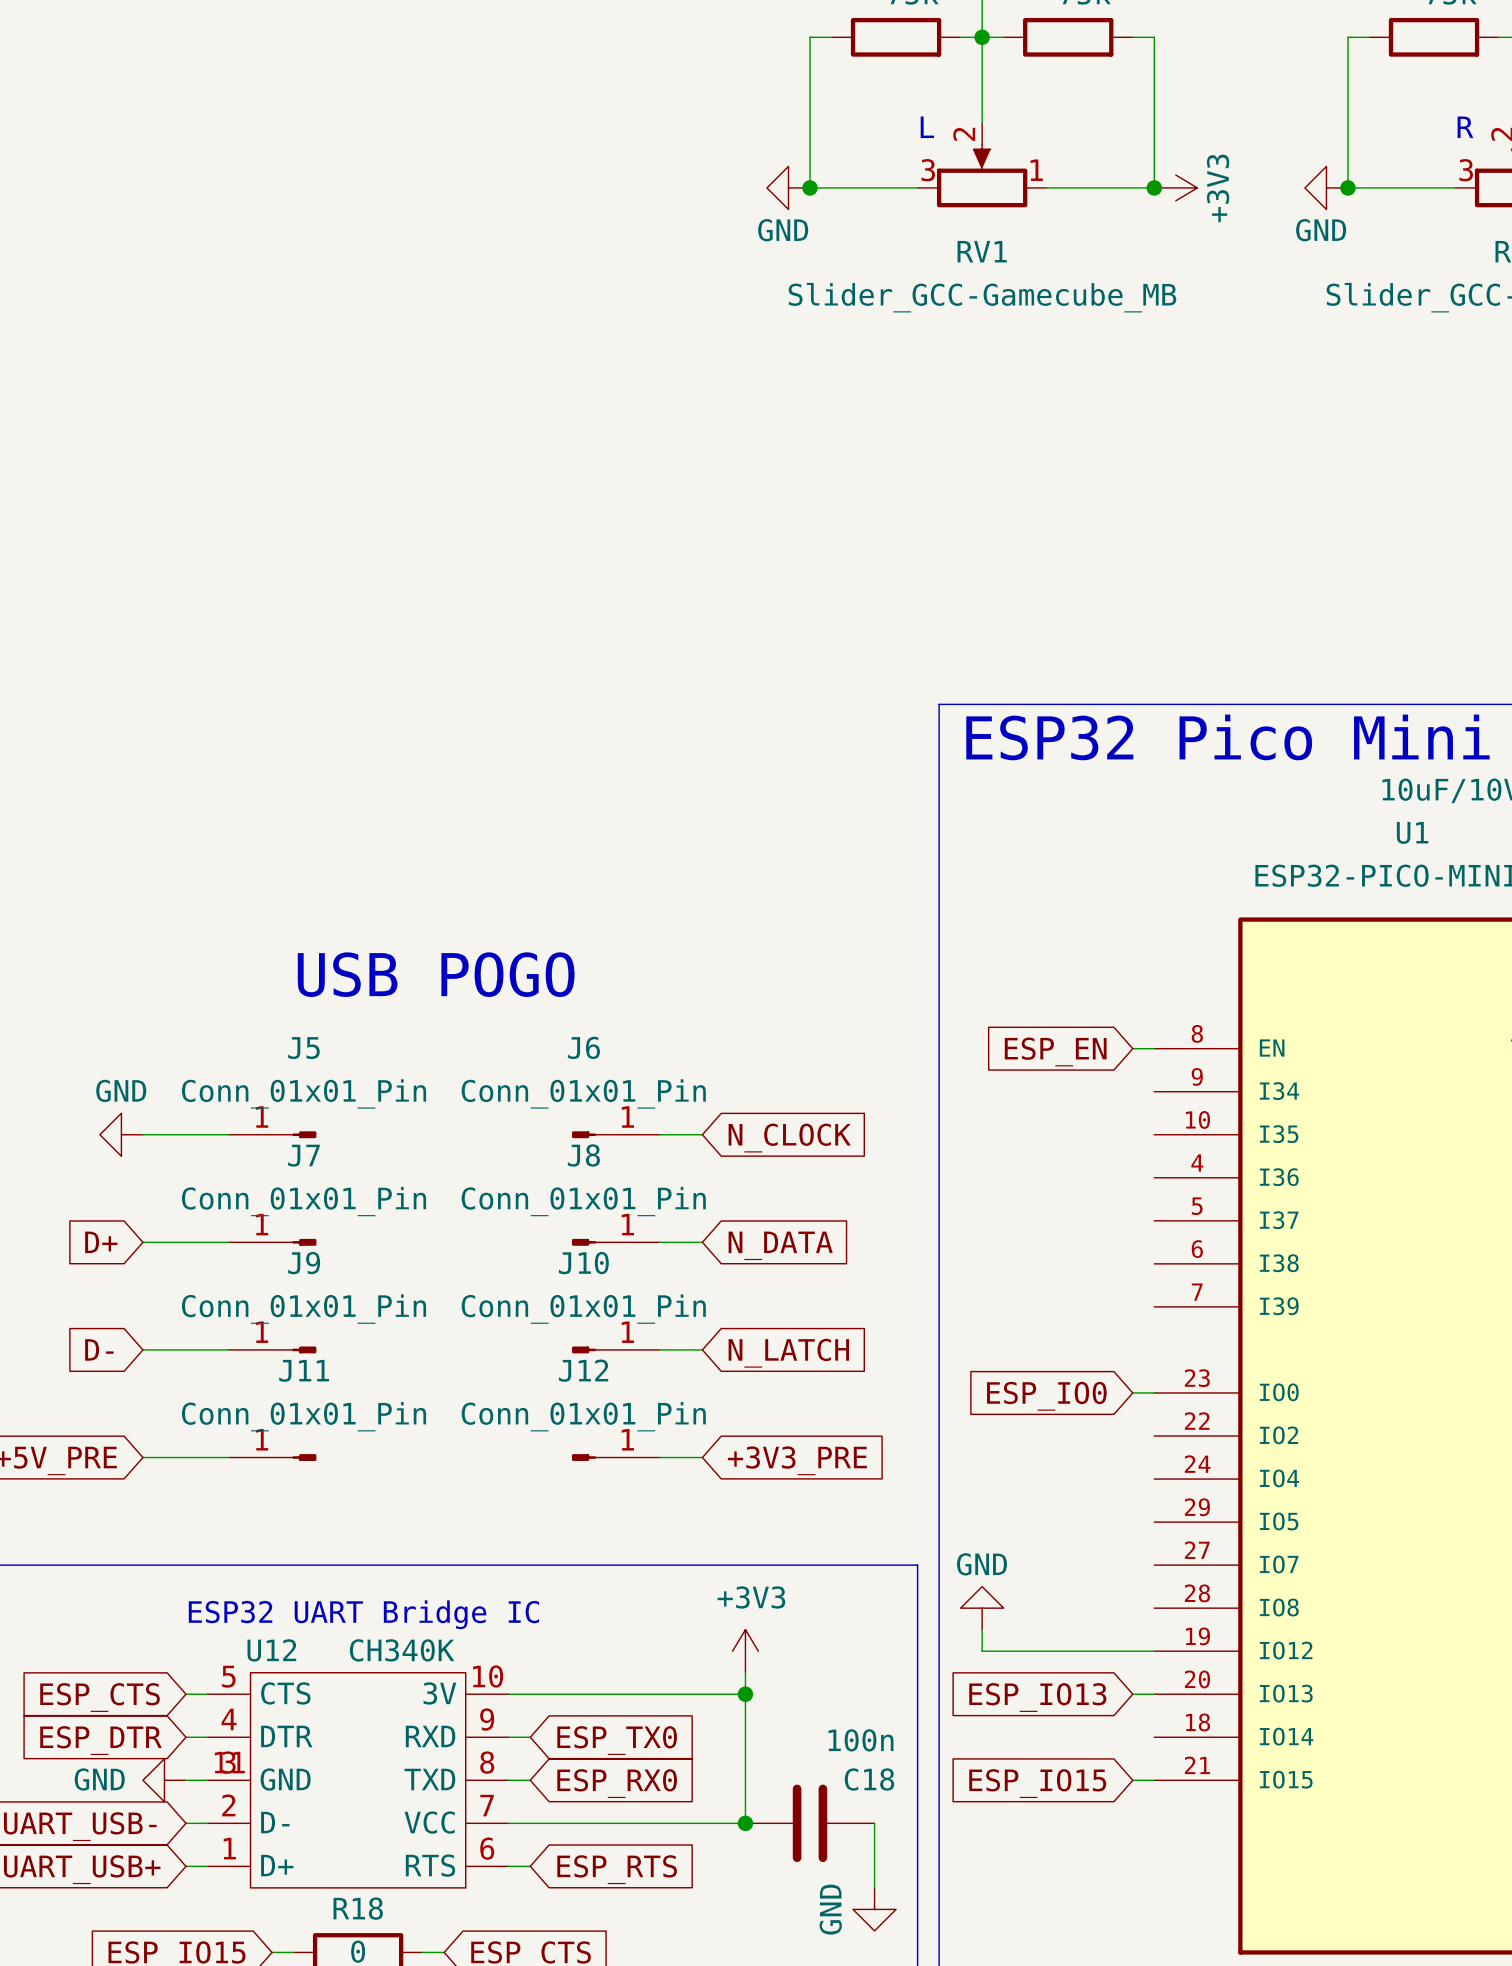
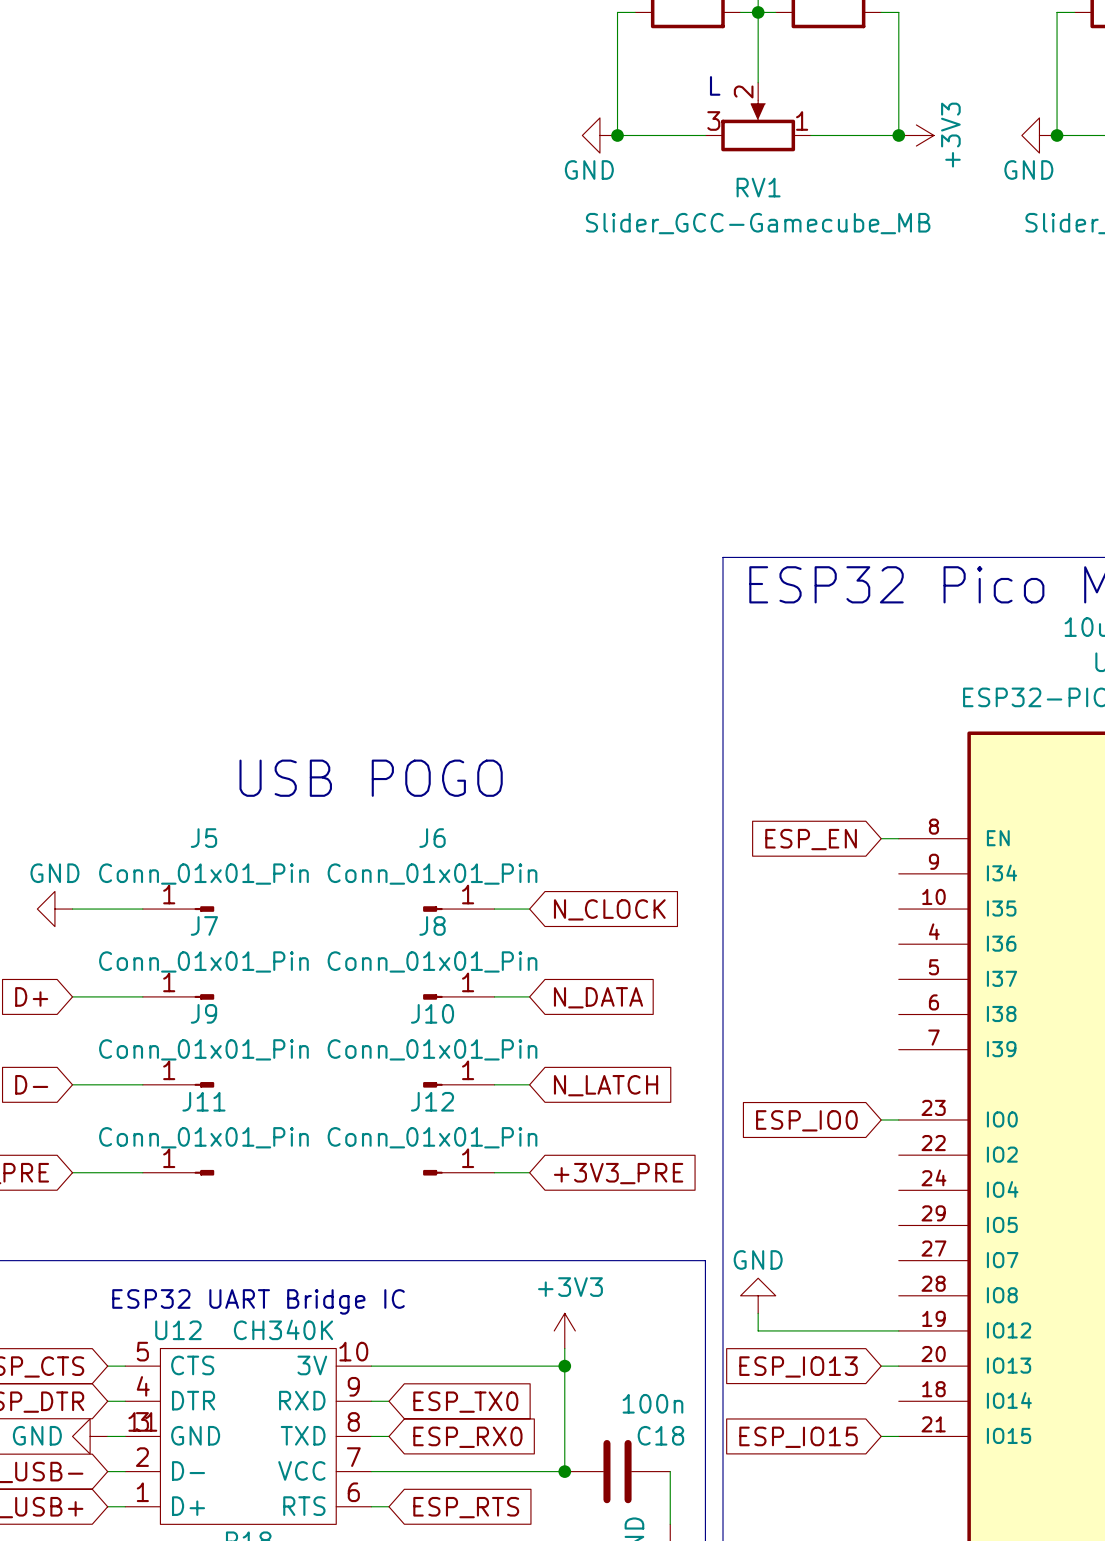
text position: USB POGO (436, 974) -> USB POGO (371, 778)

